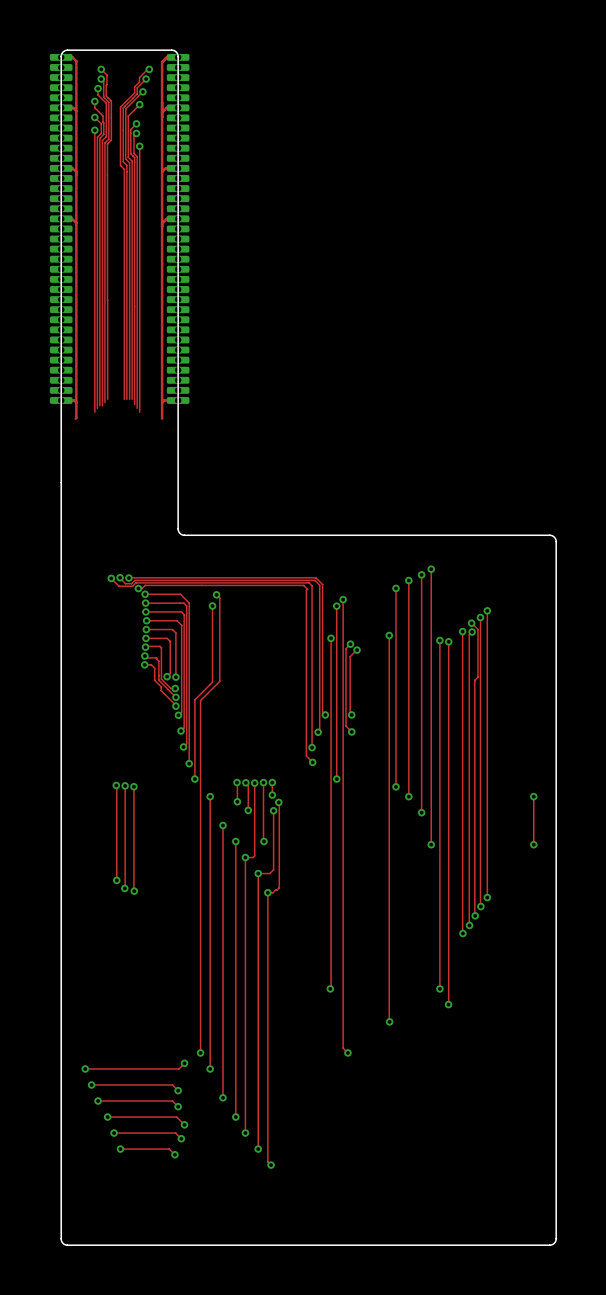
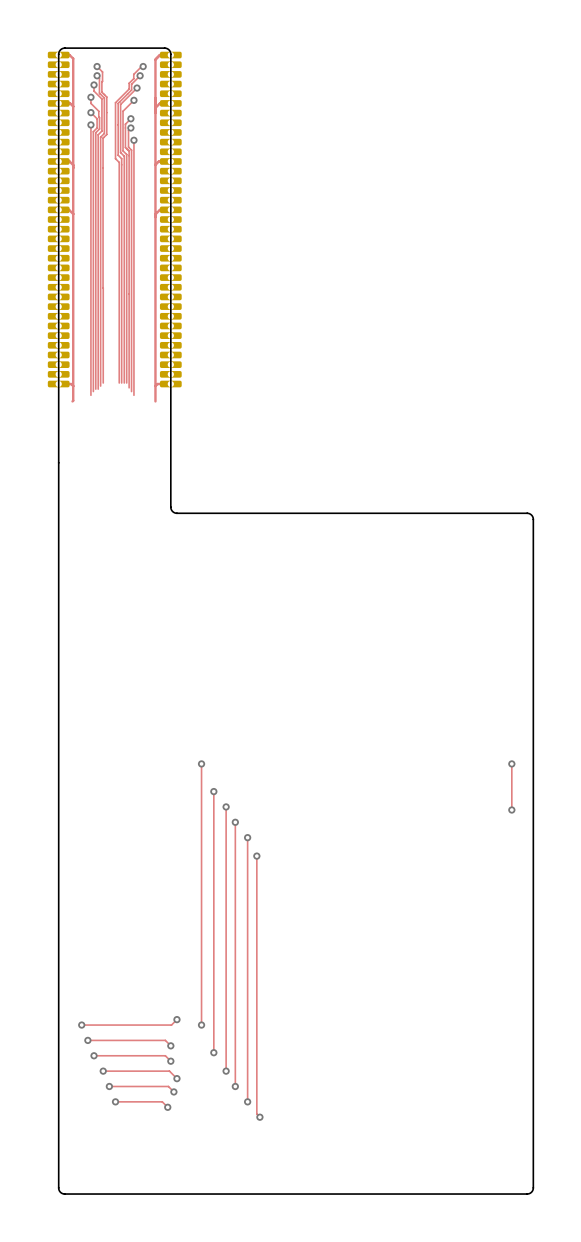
track: (431, 569) (431, 844) -> none
via: (431, 569) -> none
track: (421, 574) (421, 812) -> none
via: (421, 574) -> none
track: (120, 577) (125, 583) (131, 583) (134, 580) (314, 580) (319, 585) (319, 730) (318, 732) -> none
via: (120, 577) -> none
track: (111, 578) (119, 586) (132, 586) (135, 582) (309, 582) (312, 585) (312, 747) -> none
via: (111, 578) -> none
track: (128, 578) (315, 577) (322, 584) (322, 712) (325, 714) -> none
via: (128, 578) -> none
track: (408, 580) (408, 796) -> none
via: (408, 580) -> none
track: (138, 588) (142, 588) (145, 585) (303, 585) (307, 589) (306, 756) (312, 762) -> none
via: (138, 588) -> none
track: (396, 588) (396, 786) -> none
via: (396, 588) -> none
track: (145, 594) (180, 594) (189, 603) (189, 763) -> none
via: (145, 594) -> none
track: (216, 594) (219, 598) (219, 681) (200, 700) (200, 1052) -> none
via: (216, 594) -> none
track: (343, 599) (343, 1048) (347, 1052) -> none
via: (343, 599) -> none
track: (145, 603) (183, 603) (186, 605) (186, 743) (183, 747) -> none
via: (145, 603) -> none
track: (212, 605) (212, 682) (194, 699) (194, 779) -> none
via: (212, 605) -> none
track: (336, 606) (336, 779) -> none
via: (336, 606) -> none
track: (487, 610) (487, 897) -> none
via: (487, 610) -> none
track: (145, 611) (181, 611) (184, 614) (184, 727) (181, 730) -> none
via: (145, 611) -> none
track: (480, 617) (480, 906) -> none
via: (480, 617) -> none
track: (146, 620) (177, 620) (181, 625) (181, 712) (178, 715) -> none
via: (146, 620) -> none
track: (471, 623) (477, 629) (477, 677) (474, 680) (475, 915) -> none
via: (471, 623) -> none
track: (146, 629) (172, 629) (175, 632) (175, 677) -> none
via: (146, 629) -> none
track: (462, 631) (462, 933) -> none
via: (462, 631) -> none
track: (472, 632) (469, 634) (469, 925) -> none
via: (472, 632) -> none
track: (389, 635) (389, 1021) -> none
via: (389, 635) -> none
track: (146, 638) (167, 638) (170, 641) (170, 673) (167, 676) -> none
via: (146, 638) -> none
track: (331, 638) (330, 988) -> none
via: (331, 638) -> none
track: (439, 640) (439, 988) -> none
via: (439, 640) -> none
track: (448, 641) (448, 1004) -> none
via: (448, 641) -> none
track: (350, 644) (346, 648) (346, 726) (351, 731) -> none
via: (350, 644) -> none
track: (145, 647) (161, 647) (161, 679) (170, 688) (175, 688) -> none
via: (145, 647) -> none
via: (357, 650) -> none
track: (355, 651) (357, 650) (350, 656) (351, 714) -> none
track: (144, 655) (146, 657) (156, 657) (158, 661) (158, 680) (175, 697) -> none
via: (144, 655) -> none
track: (144, 664) (151, 664) (154, 668) (154, 680) (175, 706) -> none
via: (144, 664) -> none
via: (167, 676) -> none
via: (175, 677) -> none
via: (175, 688) -> none
via: (175, 697) -> none
via: (175, 706) -> none
via: (325, 714) -> none
via: (351, 714) -> none
via: (178, 715) -> none
via: (181, 730) -> none
via: (351, 731) -> none
via: (318, 732) -> none
via: (183, 747) -> none
via: (312, 747) -> none
via: (312, 762) -> none
via: (189, 763) -> none
via: (194, 779) -> none
via: (336, 779) -> none
track: (237, 782) (237, 801) -> none
via: (237, 782) -> none
track: (245, 782) (248, 785) (248, 810) -> none
via: (245, 782) -> none
track: (263, 782) (264, 841) -> none
via: (263, 782) -> none
track: (272, 782) (272, 795) -> none
via: (272, 782) -> none
track: (254, 783) (254, 855) (245, 857) -> none
via: (254, 783) -> none
track: (116, 785) (116, 880) -> none
via: (116, 785) -> none
track: (125, 785) (124, 888) -> none
via: (125, 785) -> none
track: (133, 786) (134, 891) -> none
via: (133, 786) -> none
via: (396, 786) -> none
via: (272, 795) -> none
via: (408, 796) -> none
via: (237, 801) -> none
track: (278, 802) (279, 887) (272, 892) (267, 892) -> none
via: (278, 802) -> none
via: (248, 810) -> none
track: (273, 810) (273, 869) (269, 873) (258, 873) -> none
via: (273, 810) -> none
via: (421, 812) -> none
via: (264, 841) -> none
via: (431, 844) -> none
via: (116, 880) -> none
via: (124, 888) -> none
via: (134, 891) -> none
via: (487, 897) -> none
via: (480, 906) -> none
via: (475, 915) -> none
via: (469, 925) -> none
via: (462, 933) -> none
via: (330, 988) -> none
via: (439, 988) -> none
via: (448, 1004) -> none
via: (389, 1021) -> none
via: (200, 1052) -> none
via: (347, 1052) -> none

